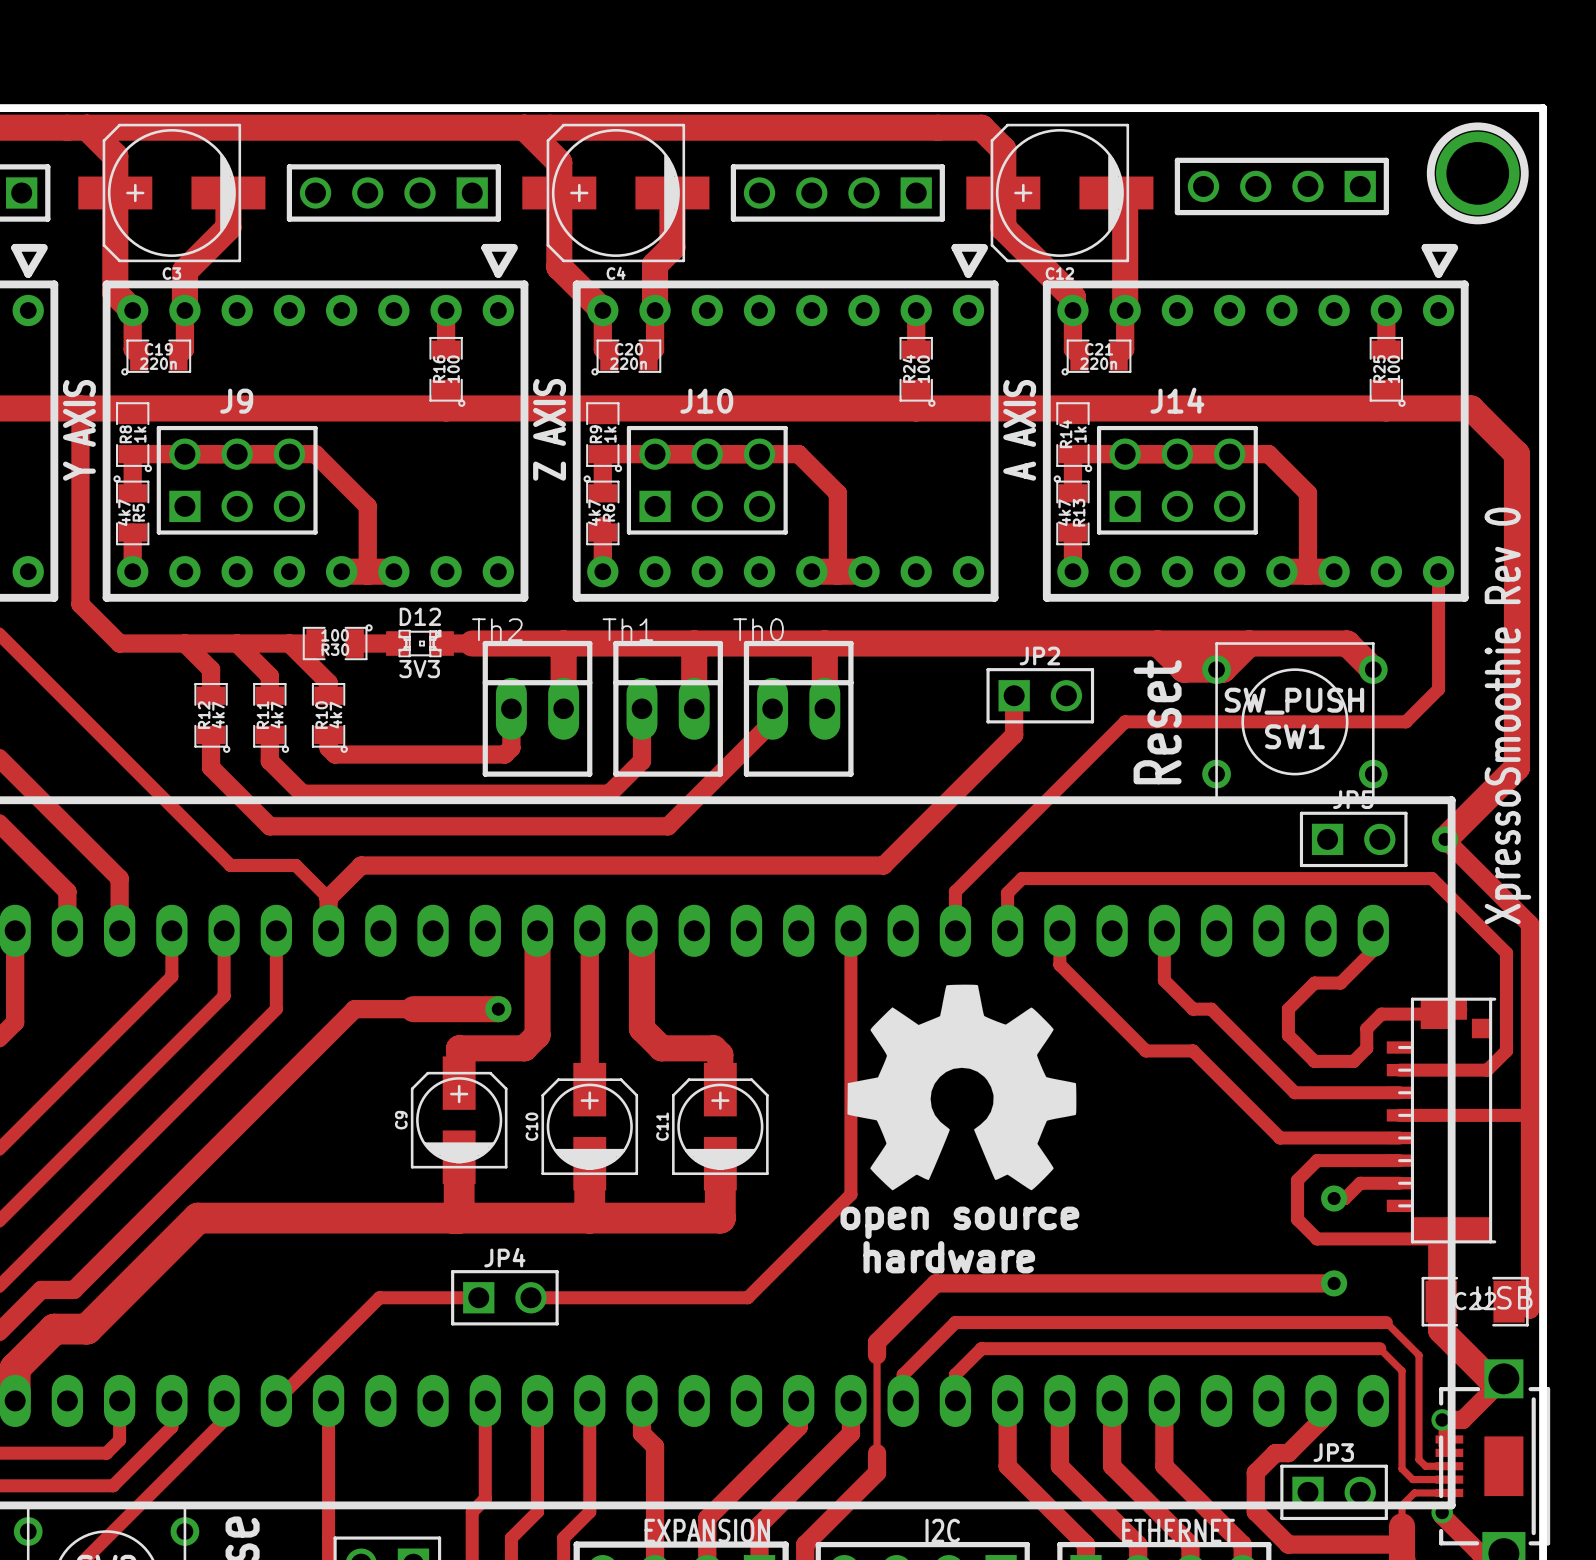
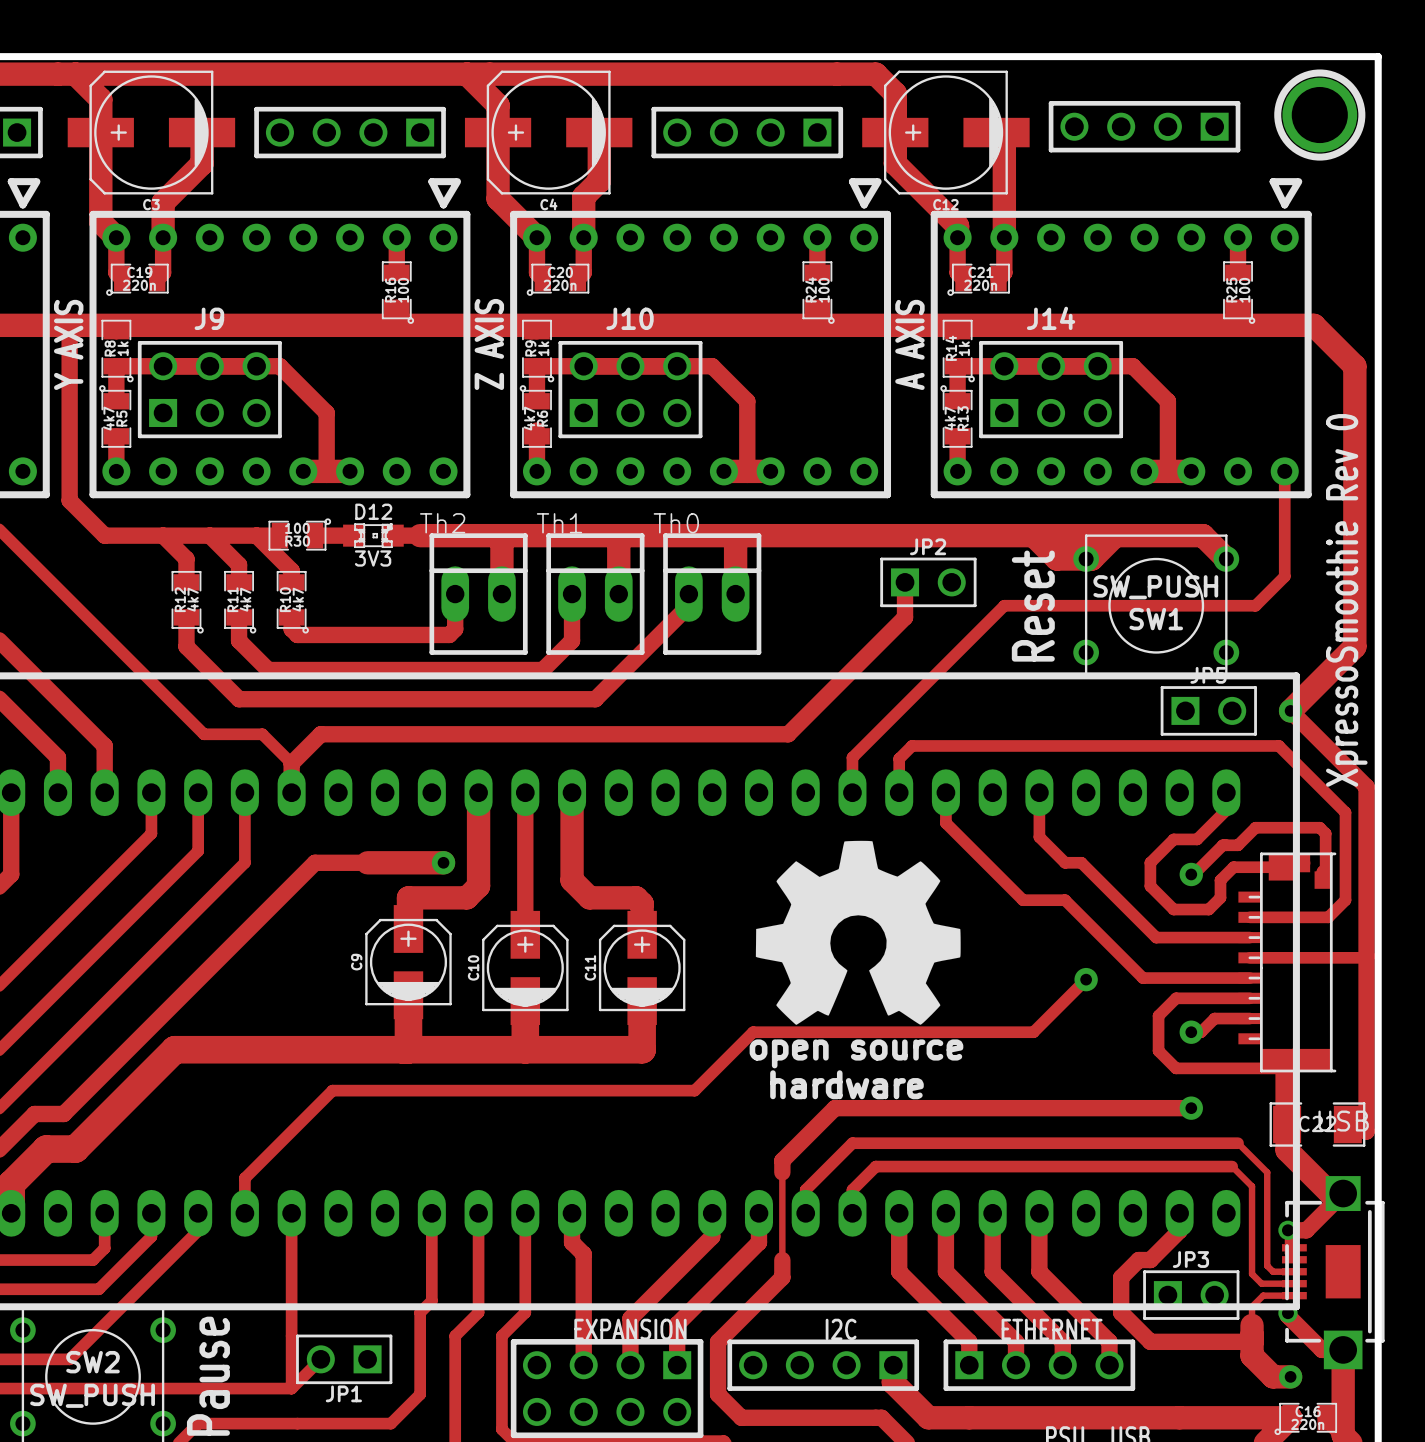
track: (850, 930) (850, 1194) (747, 1297) (530, 1297) -> none
track: none -> (1191, 874) (1193, 874) (1222, 845) (1238, 845) (1255, 827) (1319, 827) (1325, 833) (1325, 868) (1322, 871) (1322, 880)
via: none -> (1191, 874)
via: none -> (1086, 979)
track: (478, 1297) (379, 1297) (276, 1400) -> (1086, 979) (1033, 1032) (753, 1032) (694, 1090) (332, 1090) (244, 1178) (244, 1213)
JP4: (504, 1297) -> none

